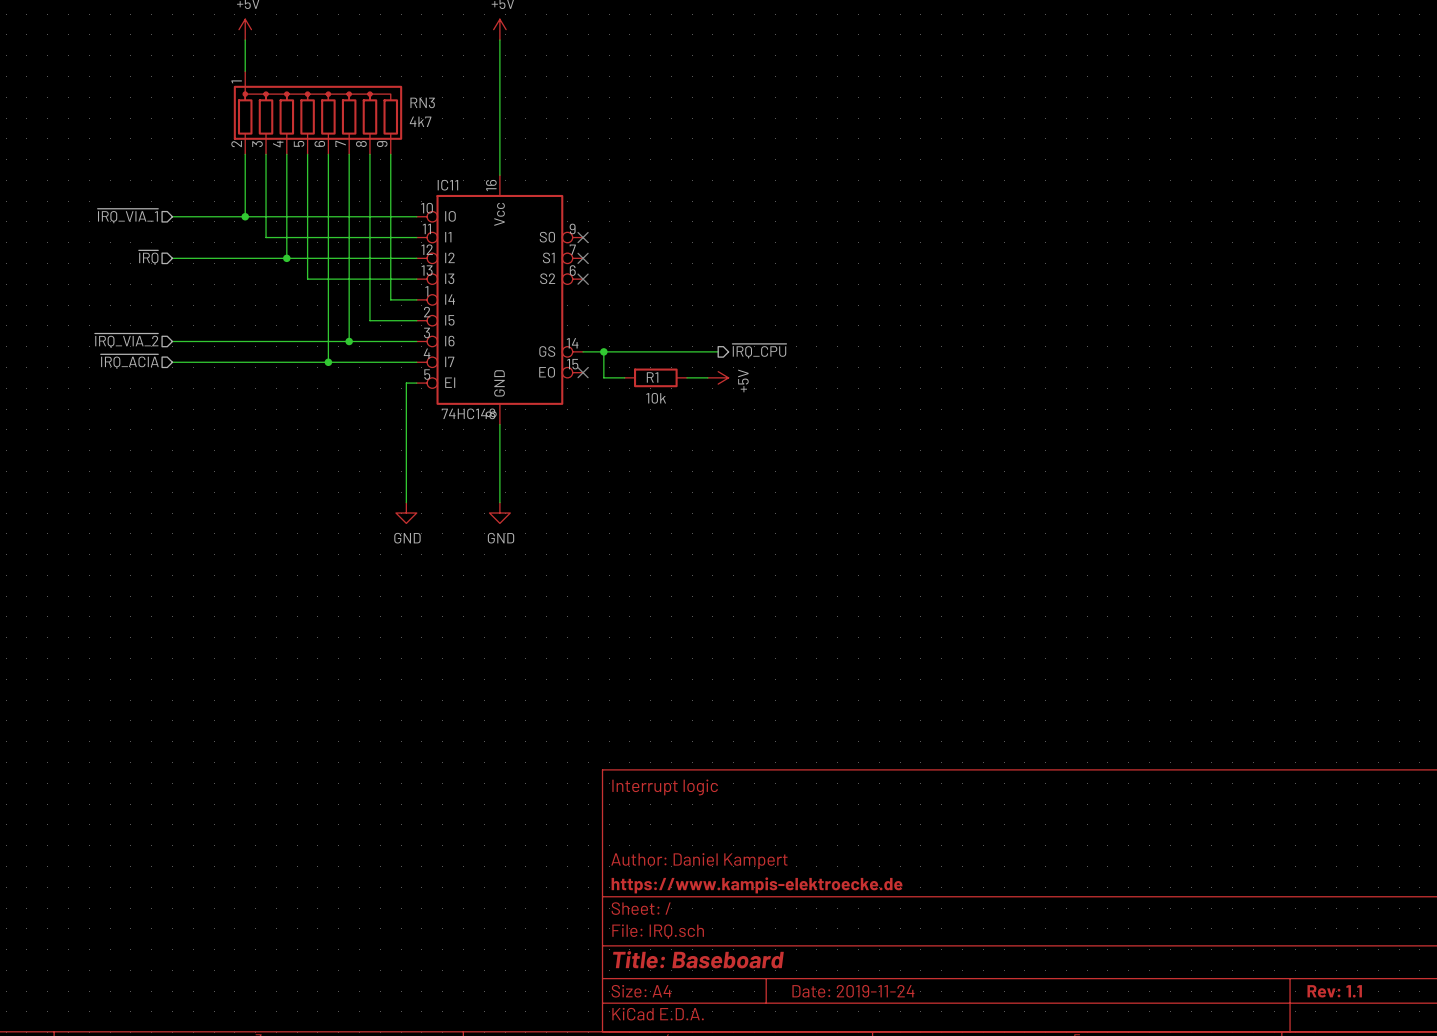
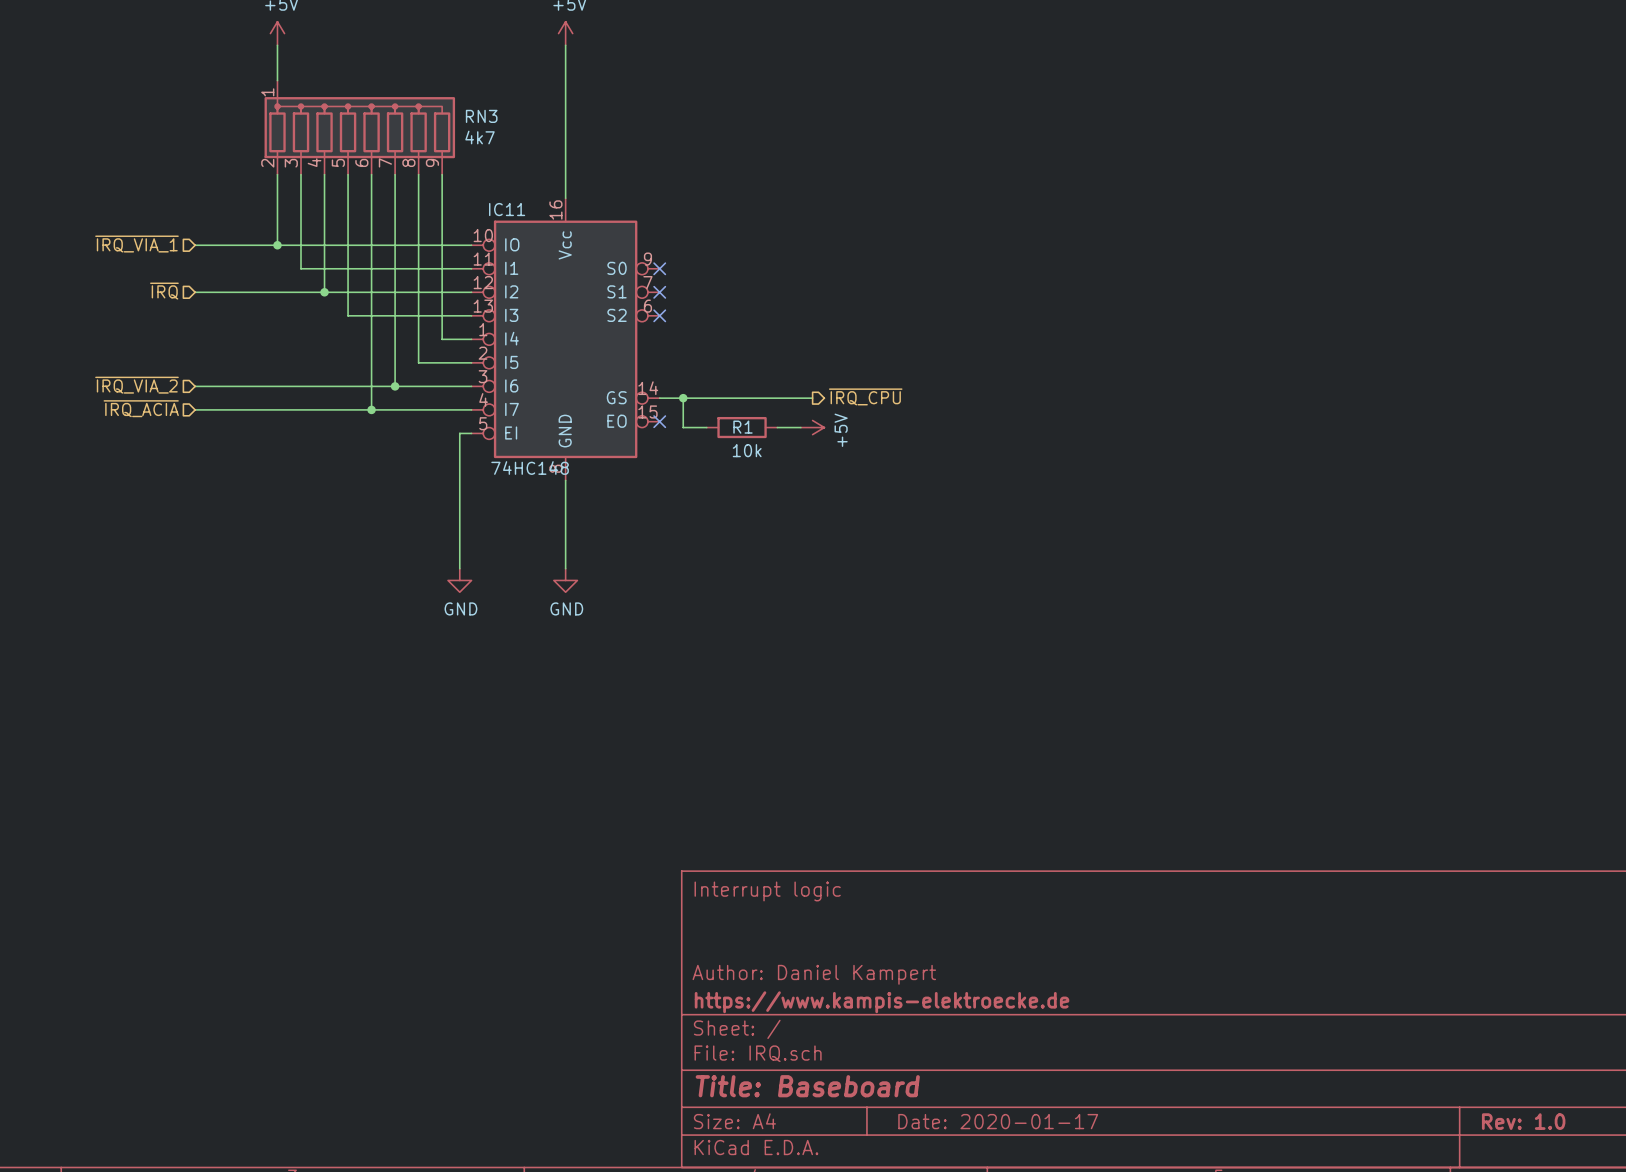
title block: Date: 2019-11-24 (853, 991) -> Date: 2020-01-17 (998, 1121)
title block: Rev: 1.1 (1334, 991) -> Rev: 1.0 (1523, 1121)

